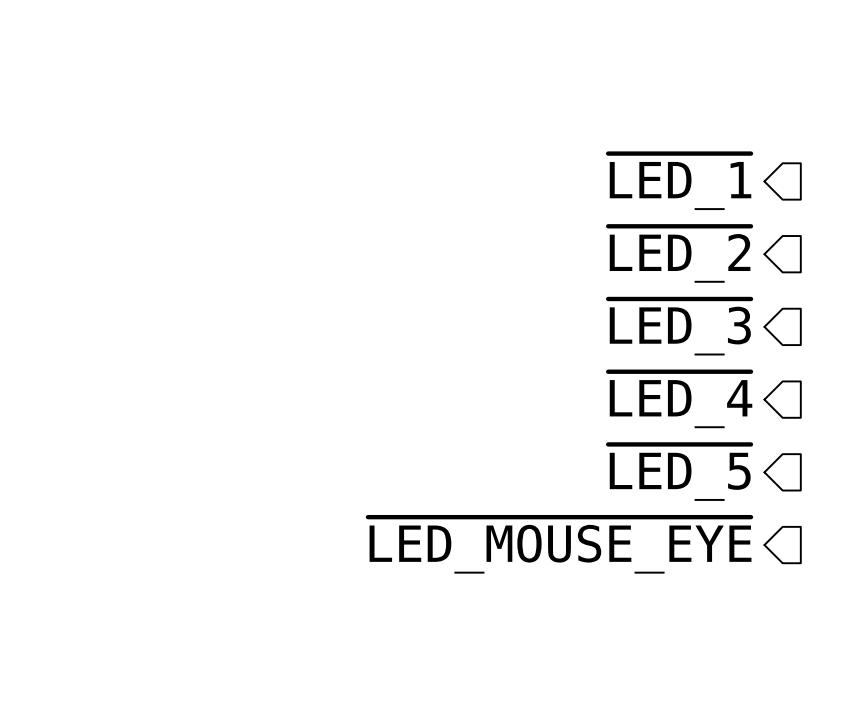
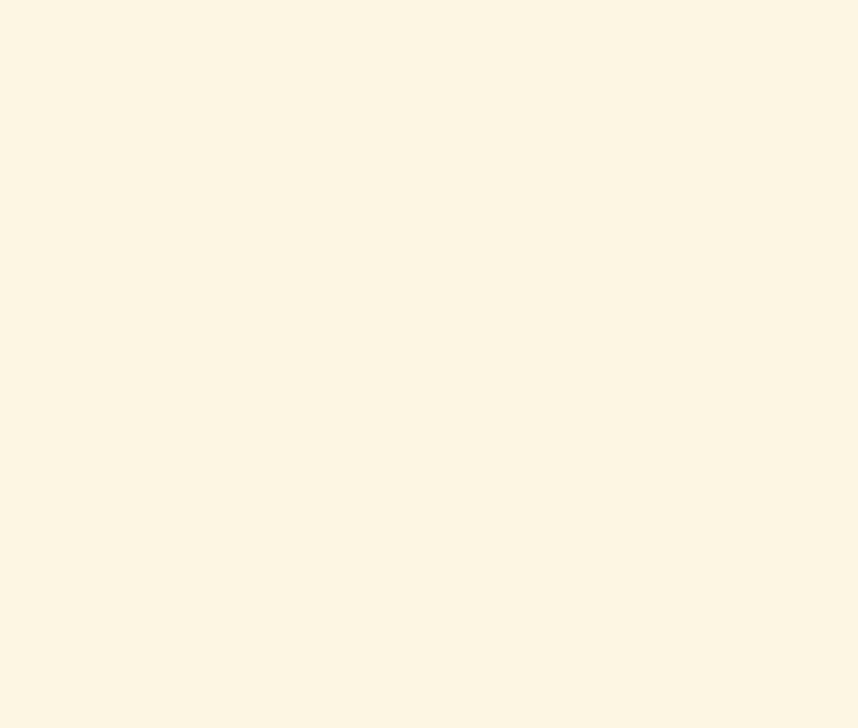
hierarchical label: ~{LED_1} (679, 181) -> none
hierarchical label: ~{LED_2} (679, 254) -> none
hierarchical label: ~{LED_3} (679, 327) -> none
hierarchical label: ~{LED_4} (680, 399) -> none
hierarchical label: ~{LED_5} (679, 472) -> none
hierarchical label: ~{LED_MOUSE_EYE} (559, 545) -> none

